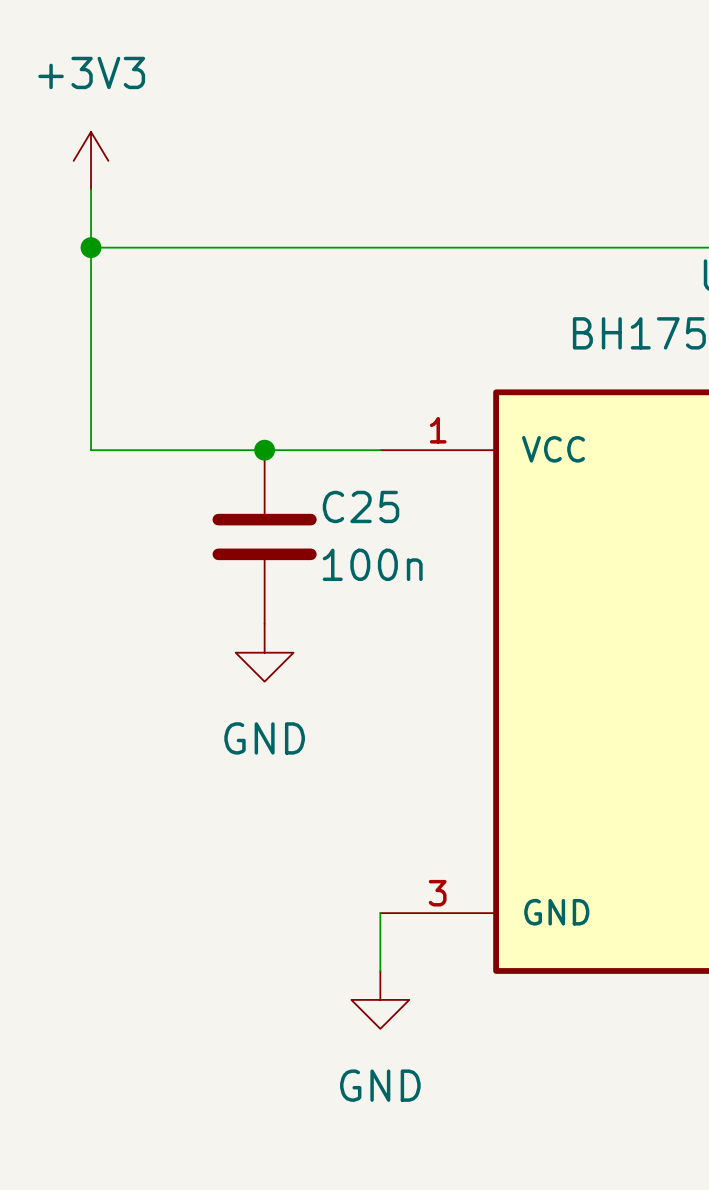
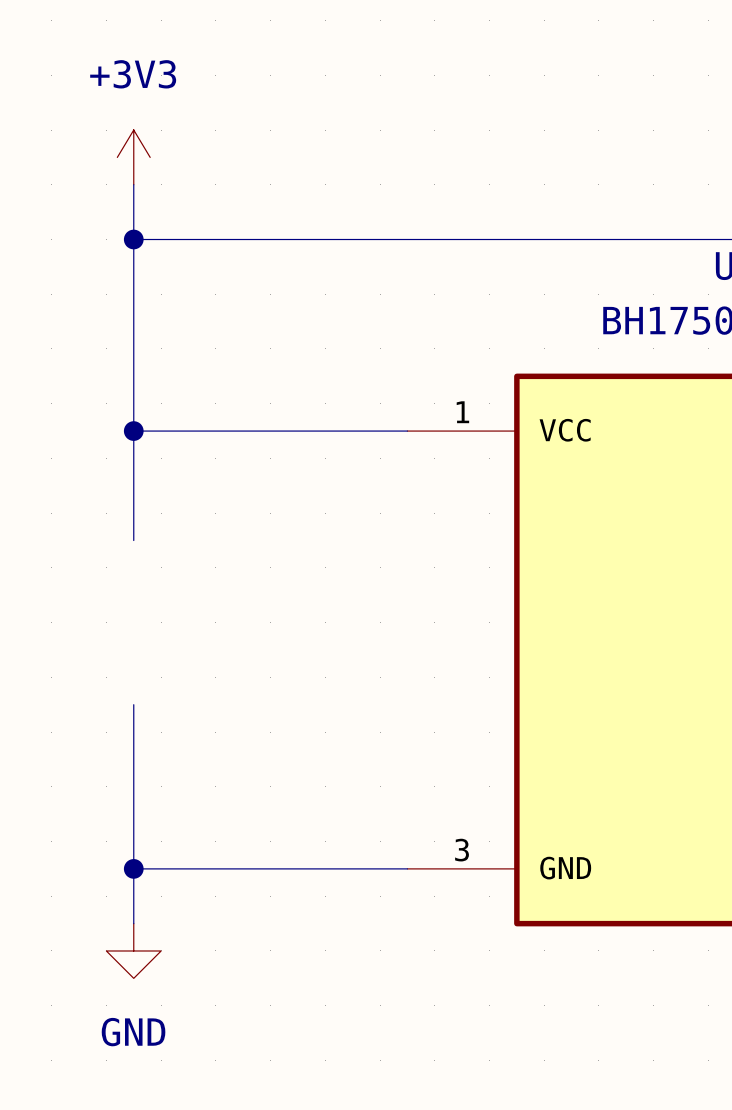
wire: none -> (133, 431) (133, 540)
junction: none -> (133, 431)
junction: (264, 450) -> none
C25: 100n (264, 536) -> none
power symbol: GND (264, 652) -> none
wire: none -> (133, 704) (133, 923)
junction: none -> (133, 868)
wire: (380, 913) (380, 970) -> (407, 868) (133, 868)
power symbol: none -> GND (133, 950)
power symbol: GND (380, 999) -> none

